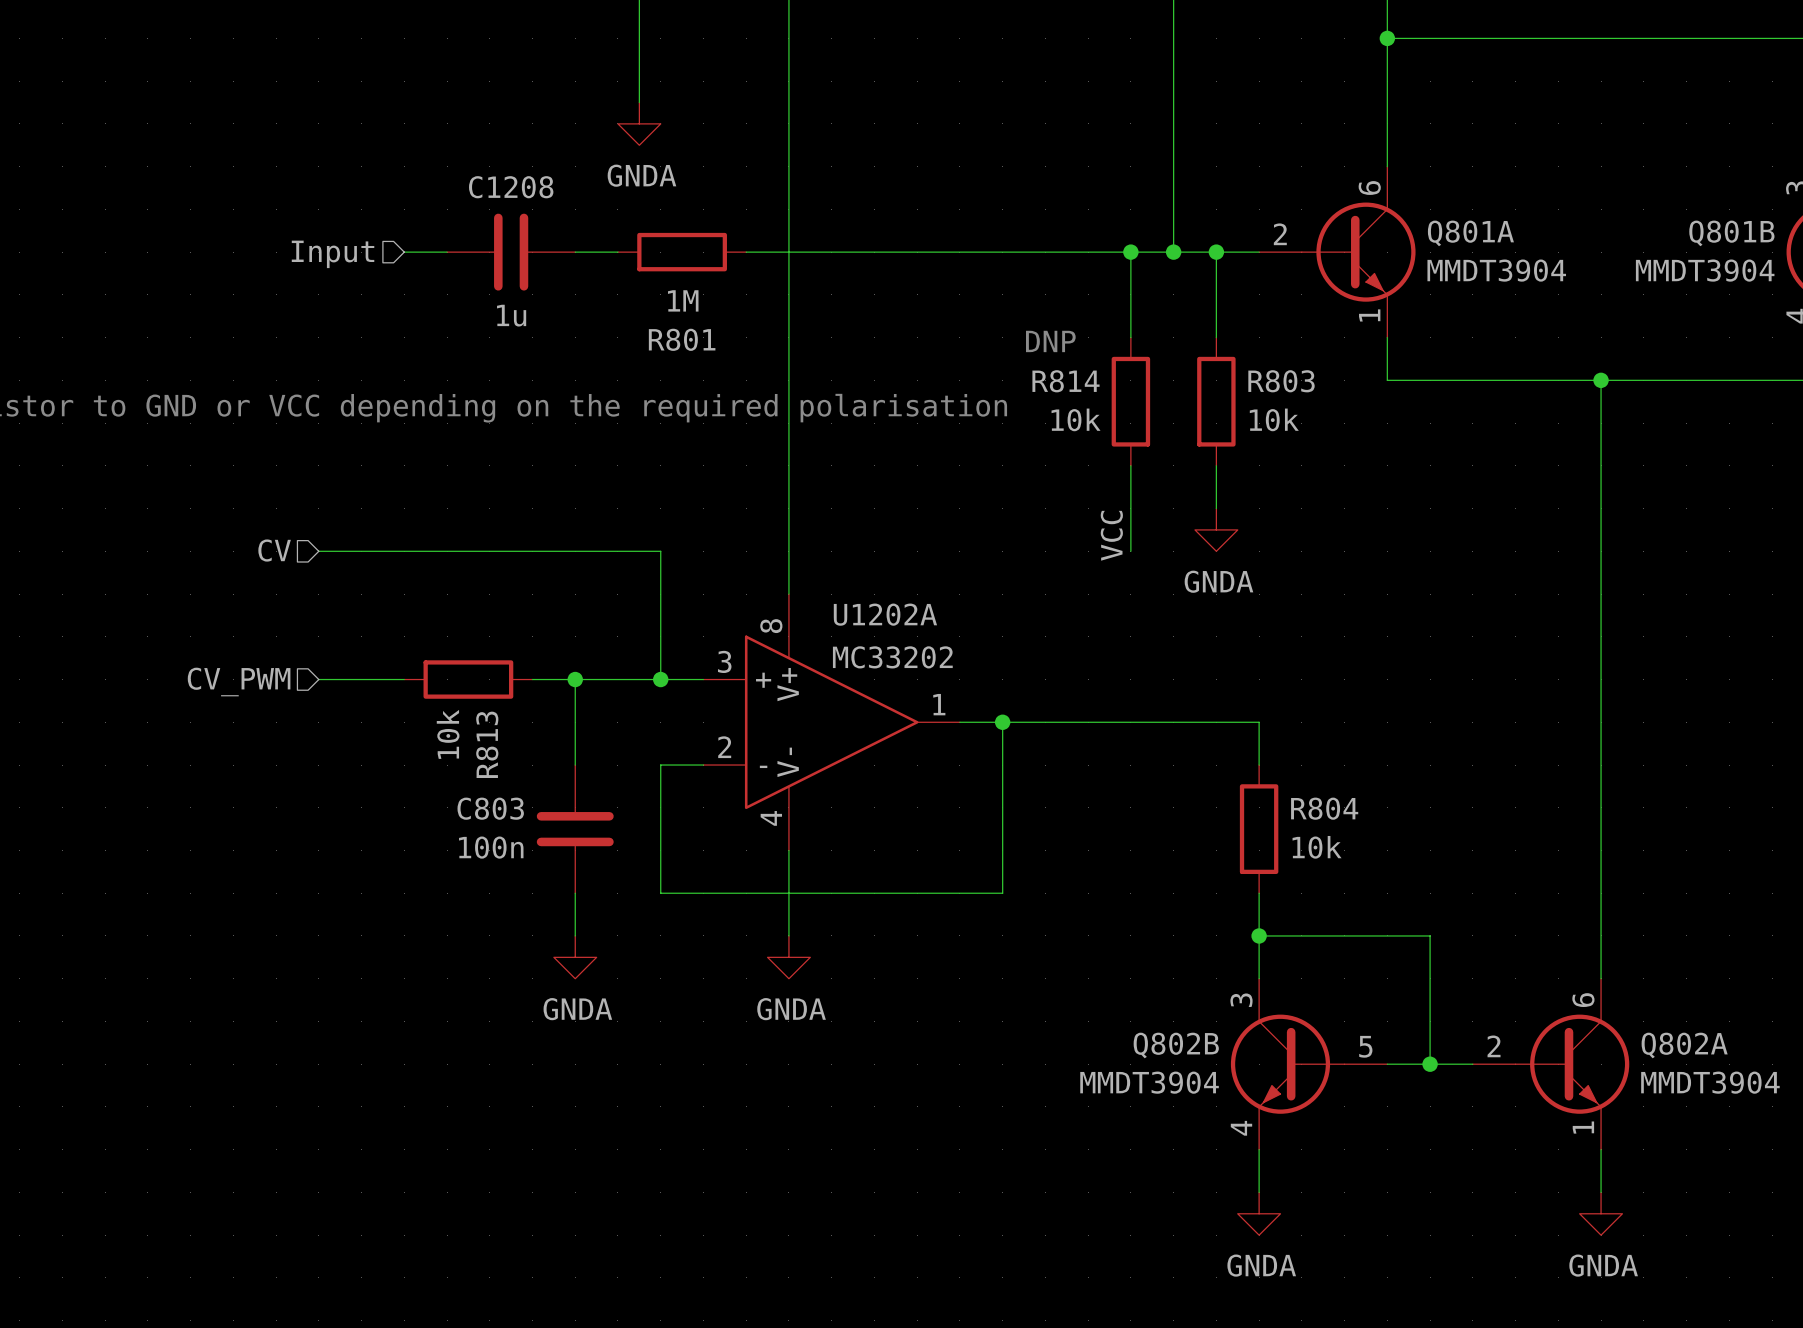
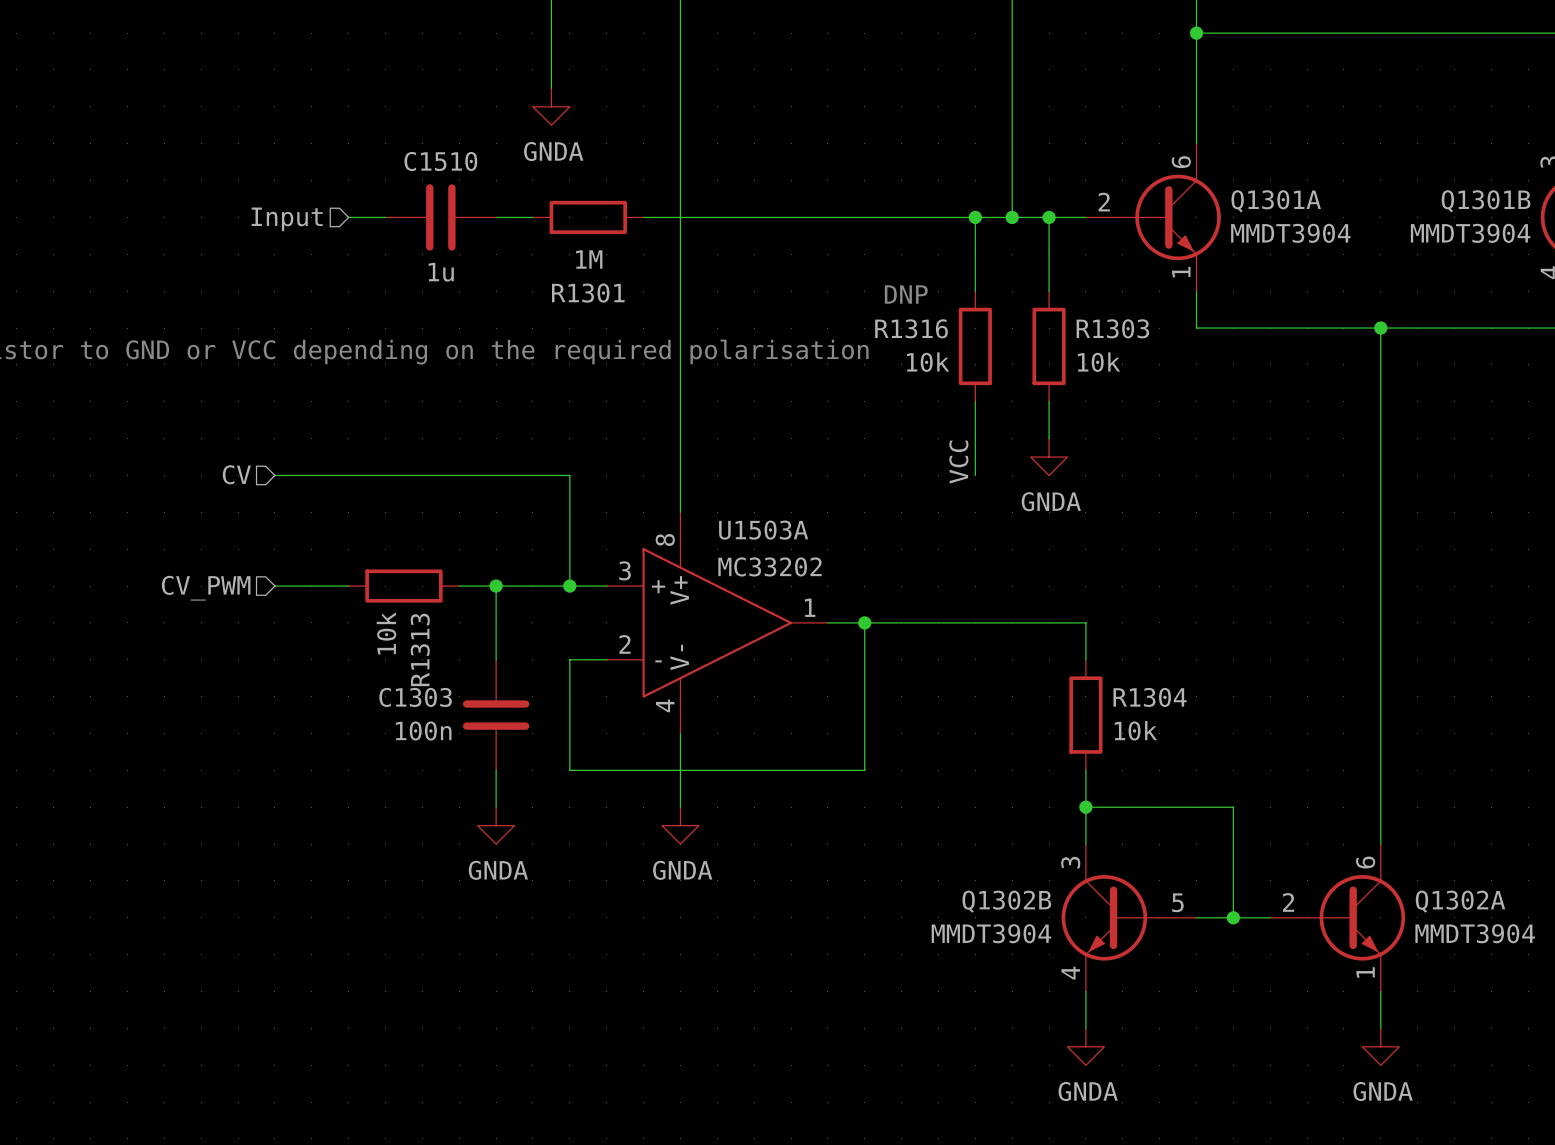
C1208 name: C1208 (511, 187) -> C1510 (440, 161)
Q801A name: Q801A (1470, 233) -> Q1301A (1276, 201)
Q801B name: Q801B (1731, 233) -> Q1301B (1486, 201)
R801 name: R801 (682, 339) -> R1301 (588, 293)
R814 name: R814 (1065, 381) -> R1316 (911, 328)
R803 name: R803 (1281, 381) -> R1303 (1112, 328)
U1202A name: U1202A (885, 614) -> U1503A (763, 530)
R813 name: R813 (487, 744) -> R1313 (420, 649)
C803 name: C803 (490, 808) -> C1303 (415, 697)
R804 name: R804 (1324, 808) -> R1304 (1150, 697)
Q802B name: Q802B (1176, 1045) -> Q1302B (1006, 901)
Q802A name: Q802A (1684, 1045) -> Q1302A (1460, 901)

